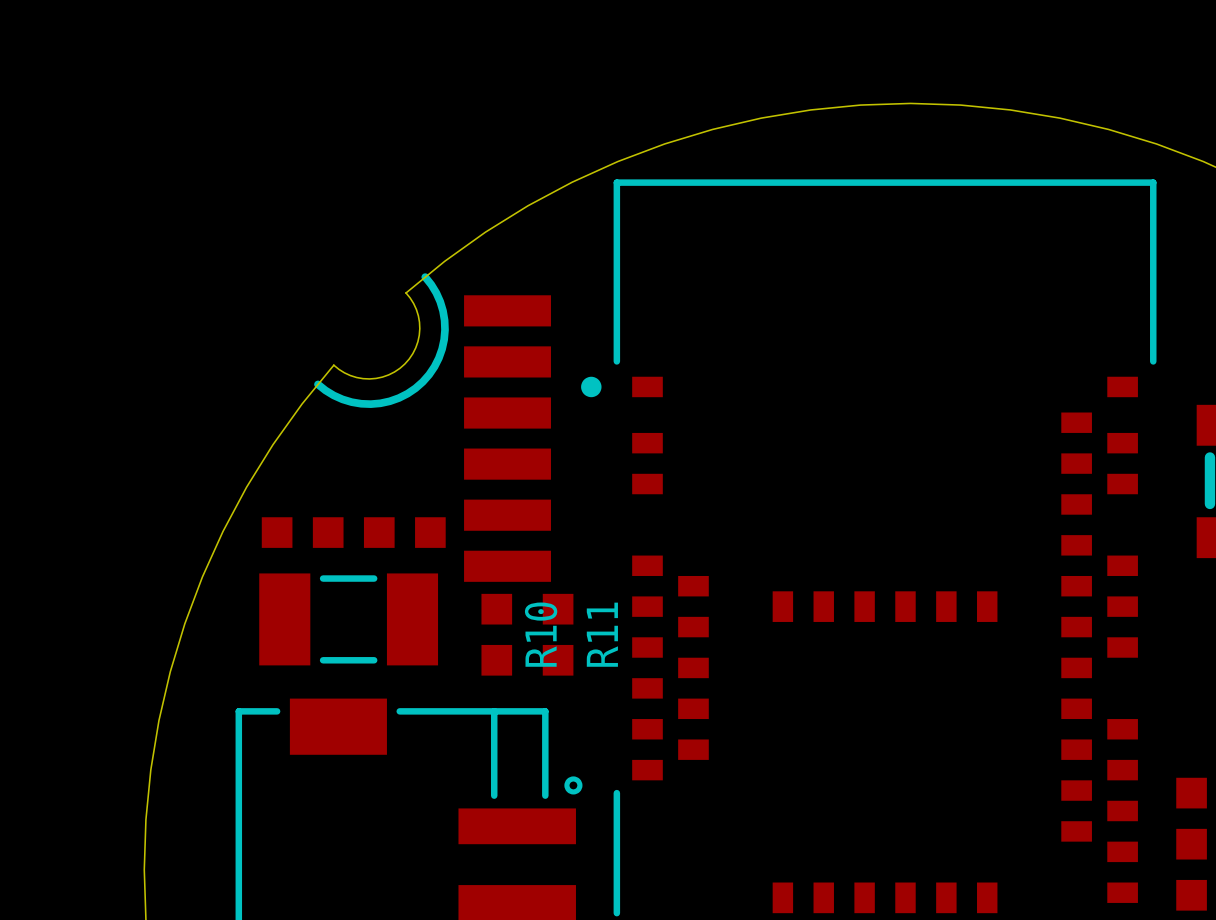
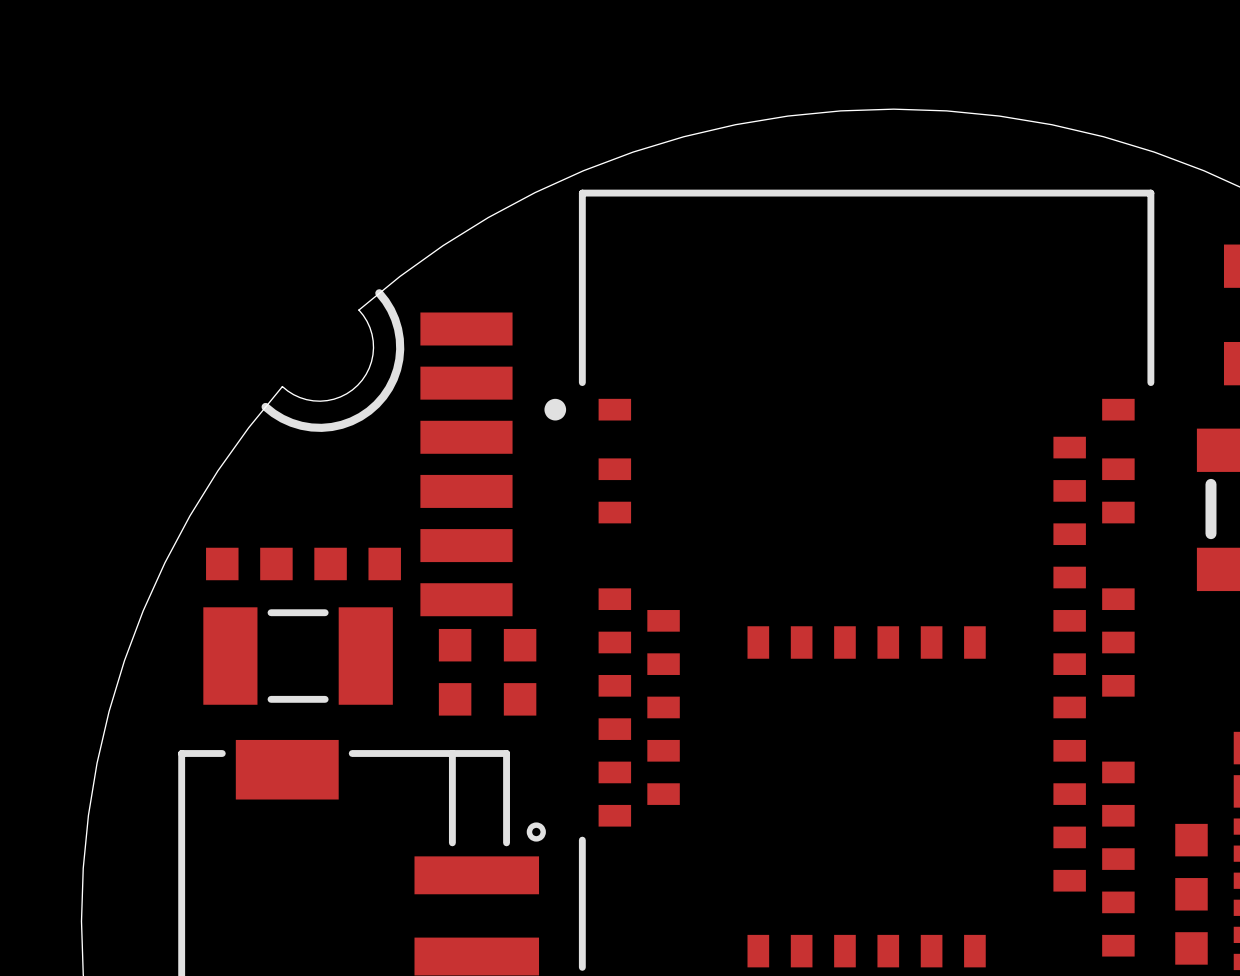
R10 name: R10 (541, 634) -> none
R11 name: R11 (602, 634) -> none

